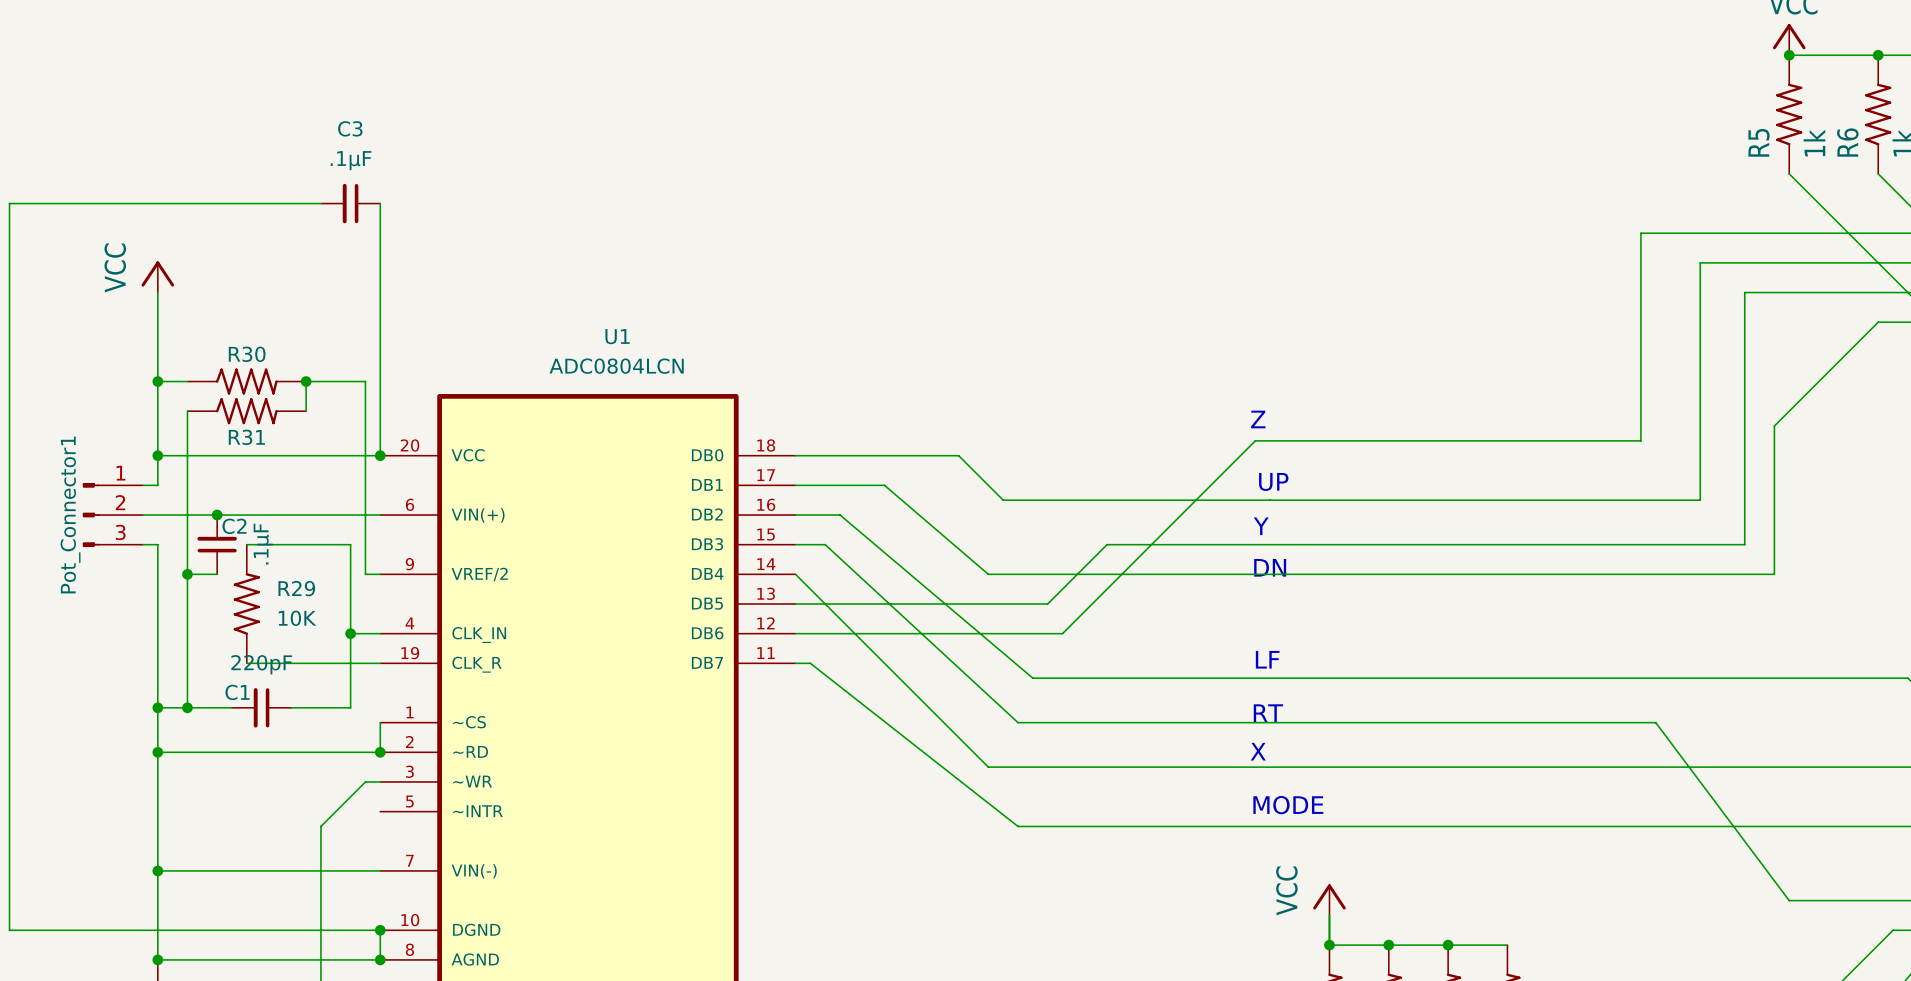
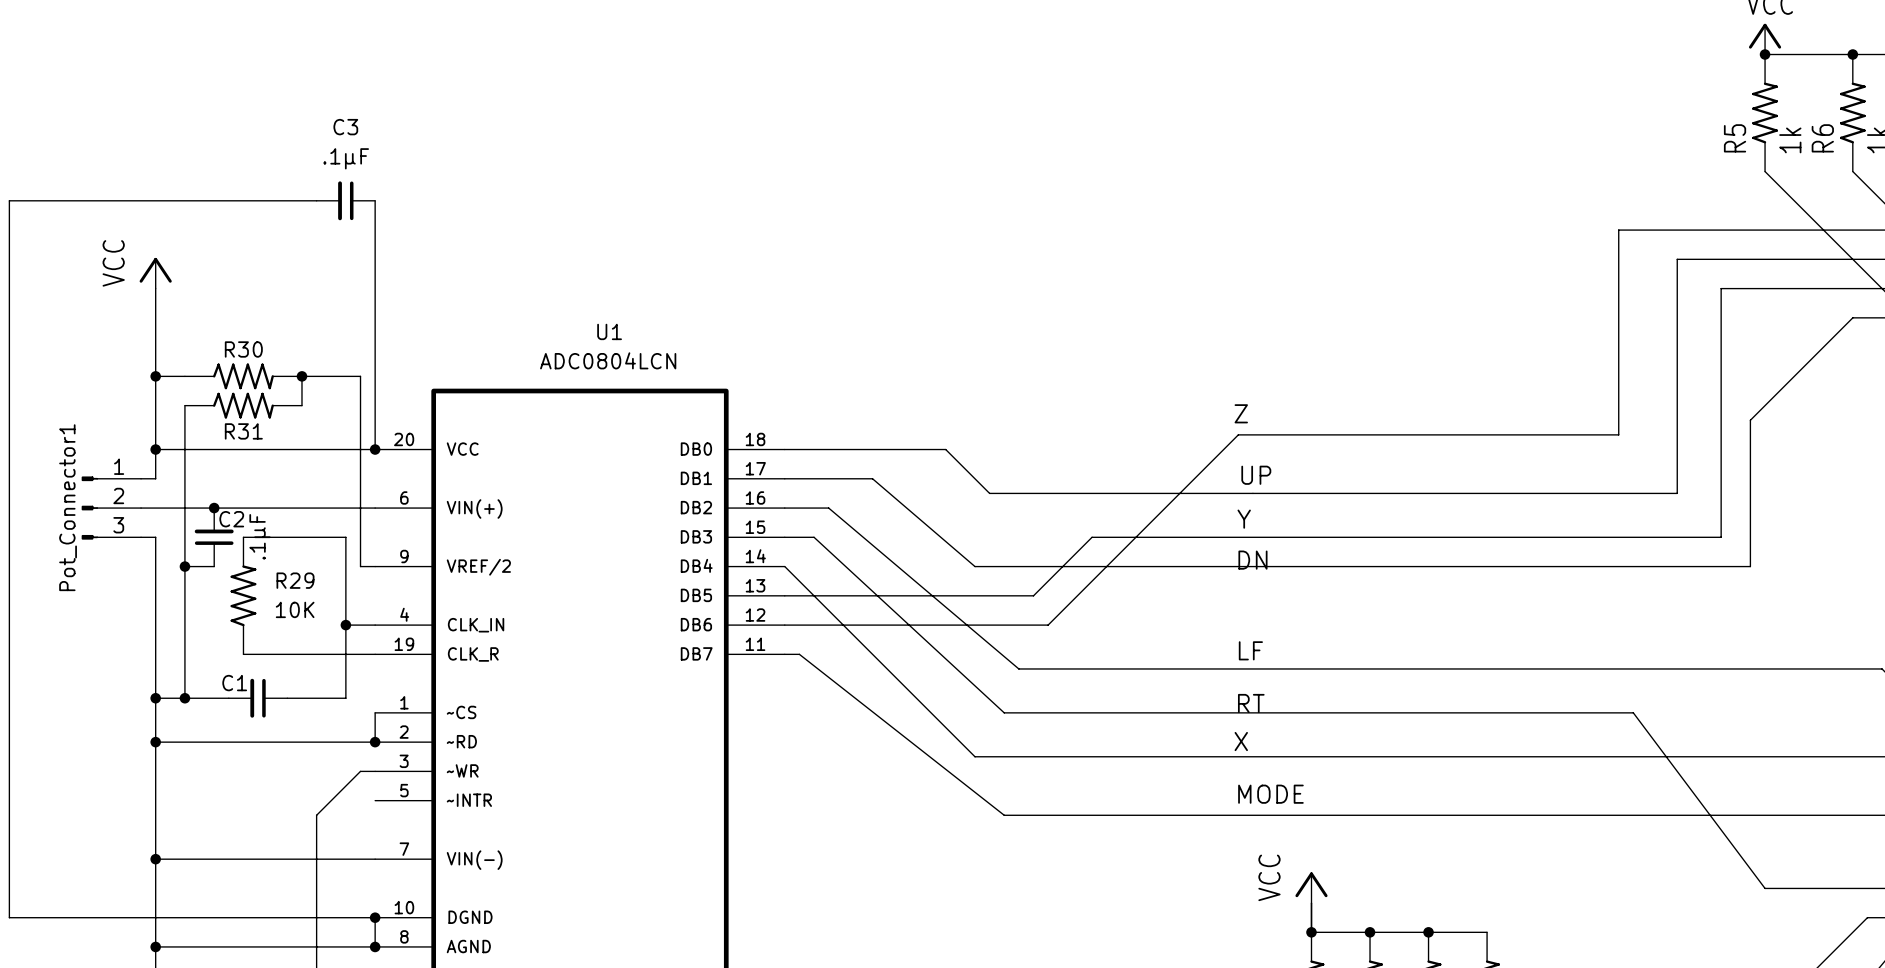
C1 value: 220pF (261, 664) -> none

